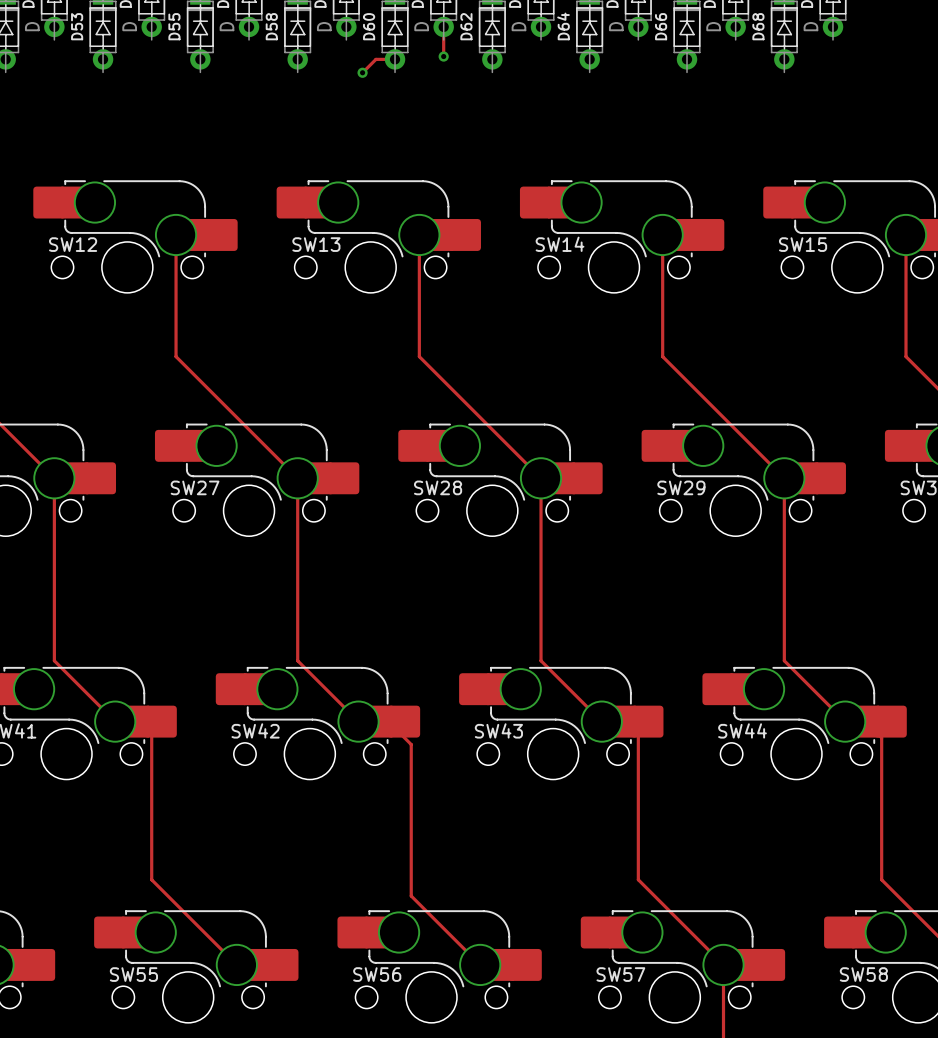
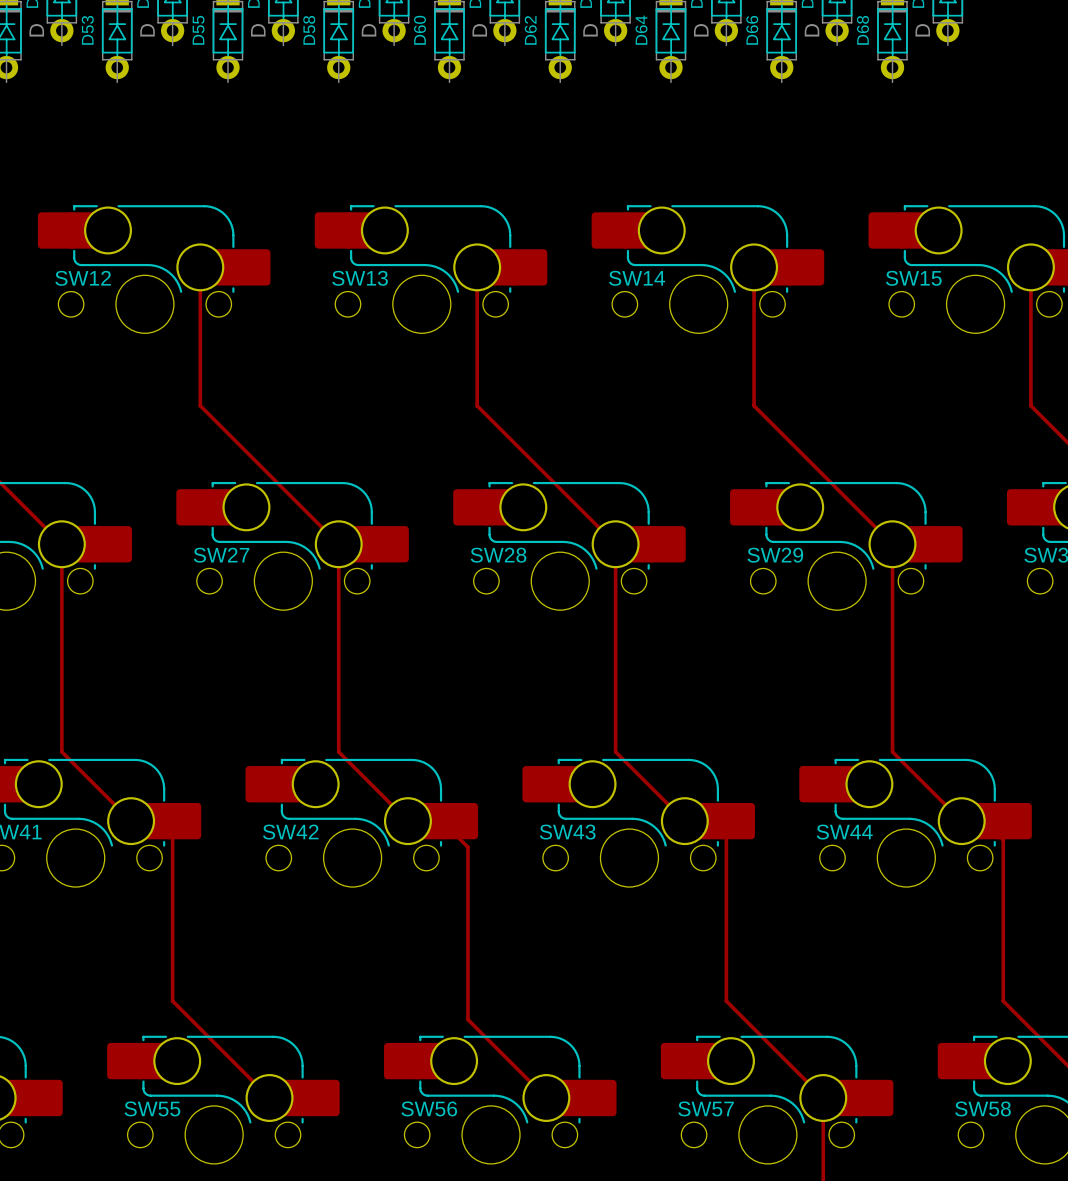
track: (443, 26) (443, 56) -> none
via: (443, 56) -> none
track: (395, 59) (375, 59) (362, 72) -> none
via: (362, 72) -> none

